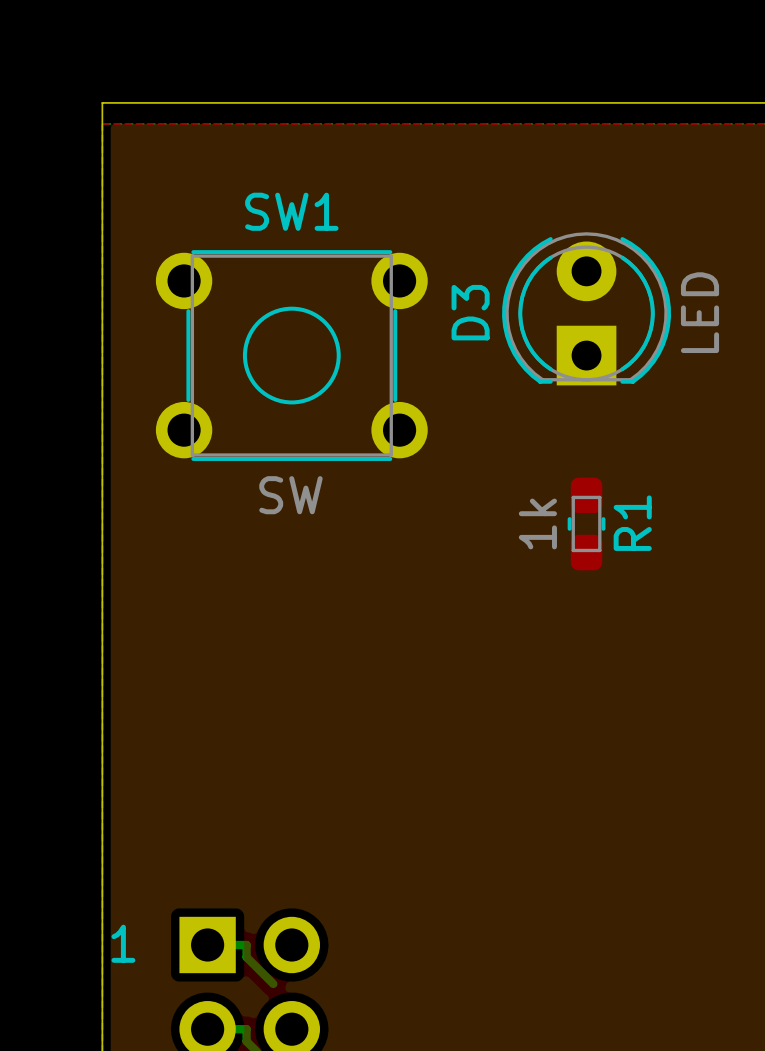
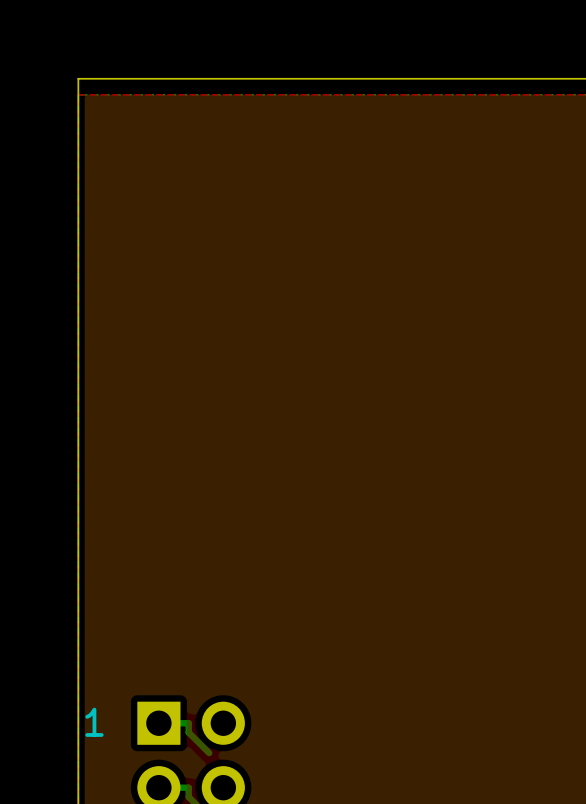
D3: LED (586, 308) -> none
SW1: SW (291, 355) -> none
R1: 1k (586, 523) -> none

